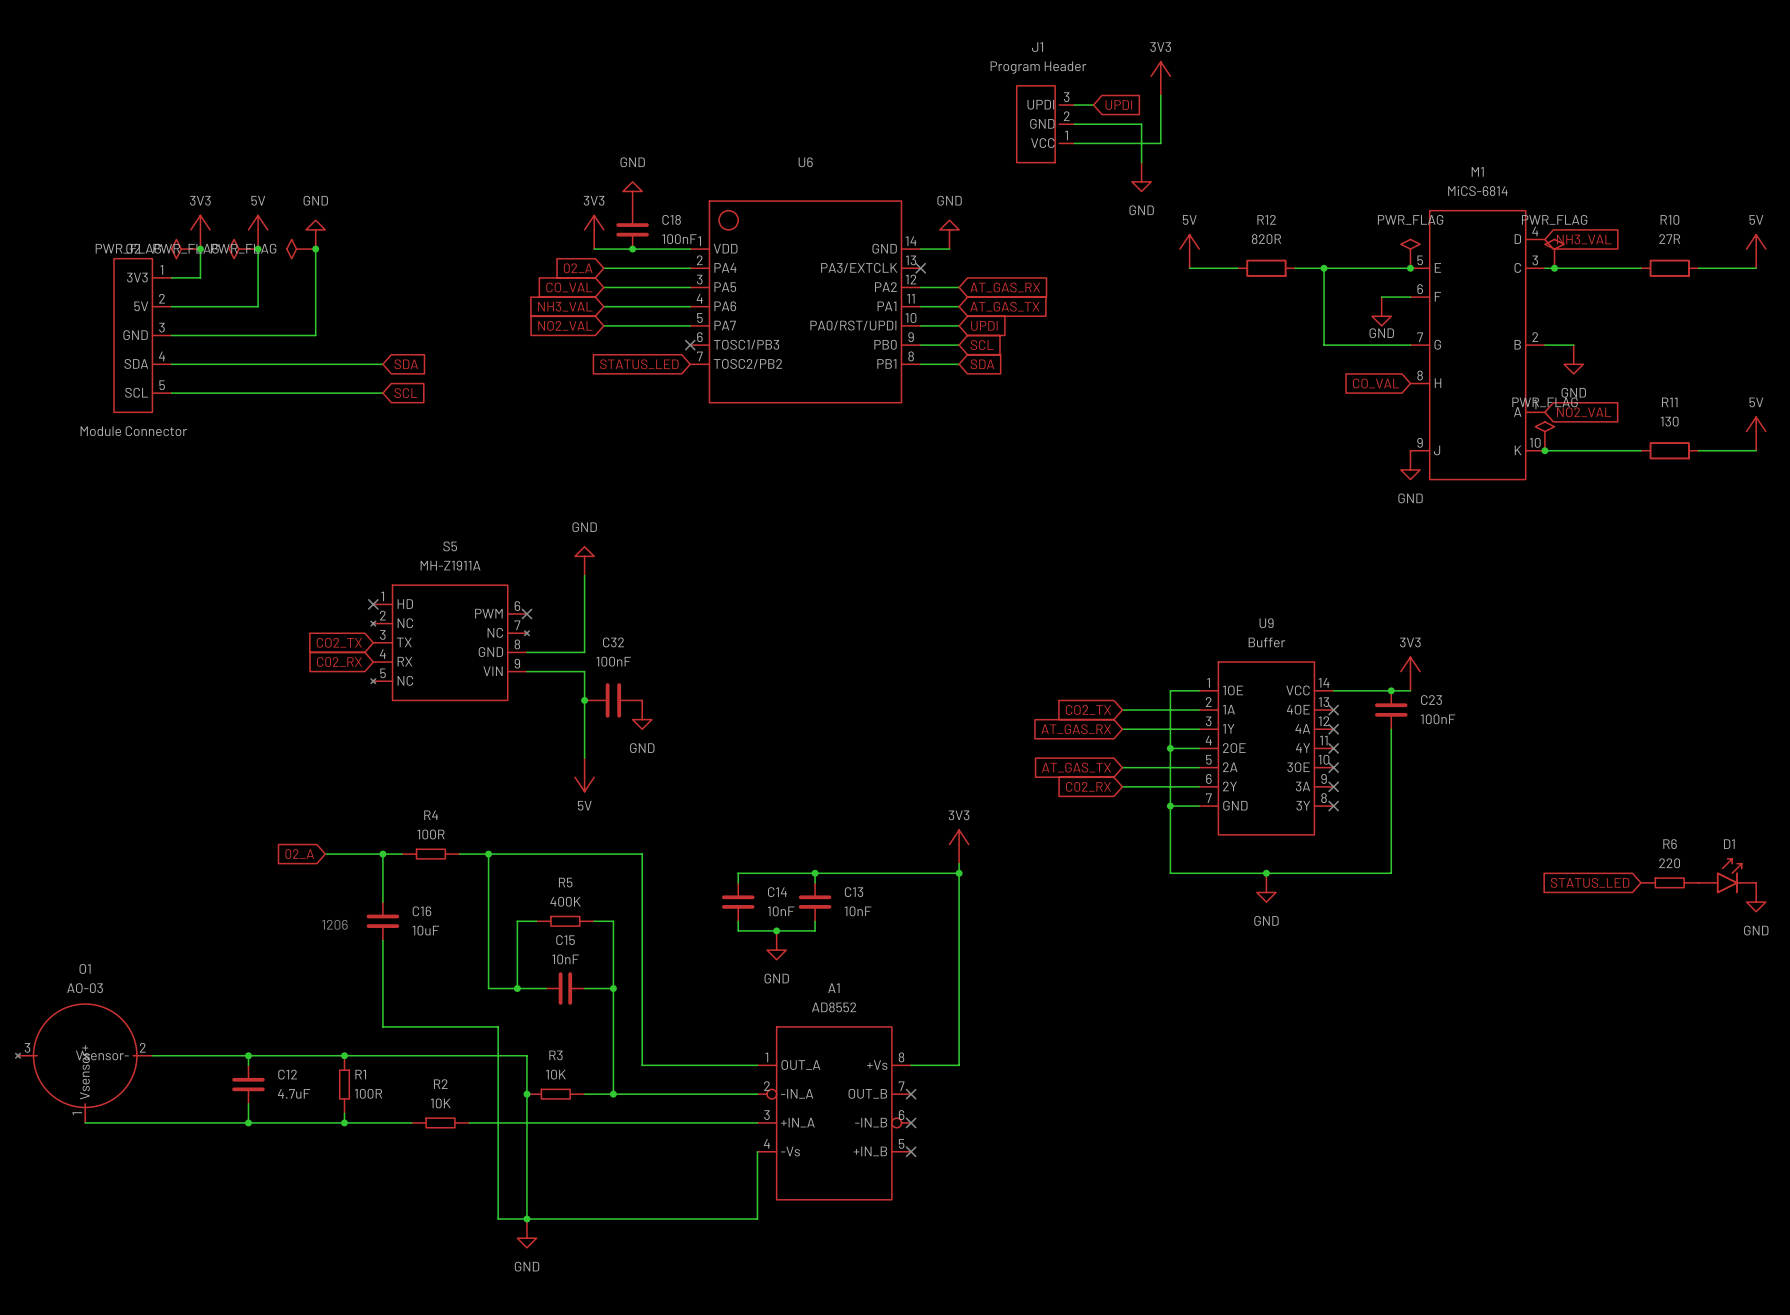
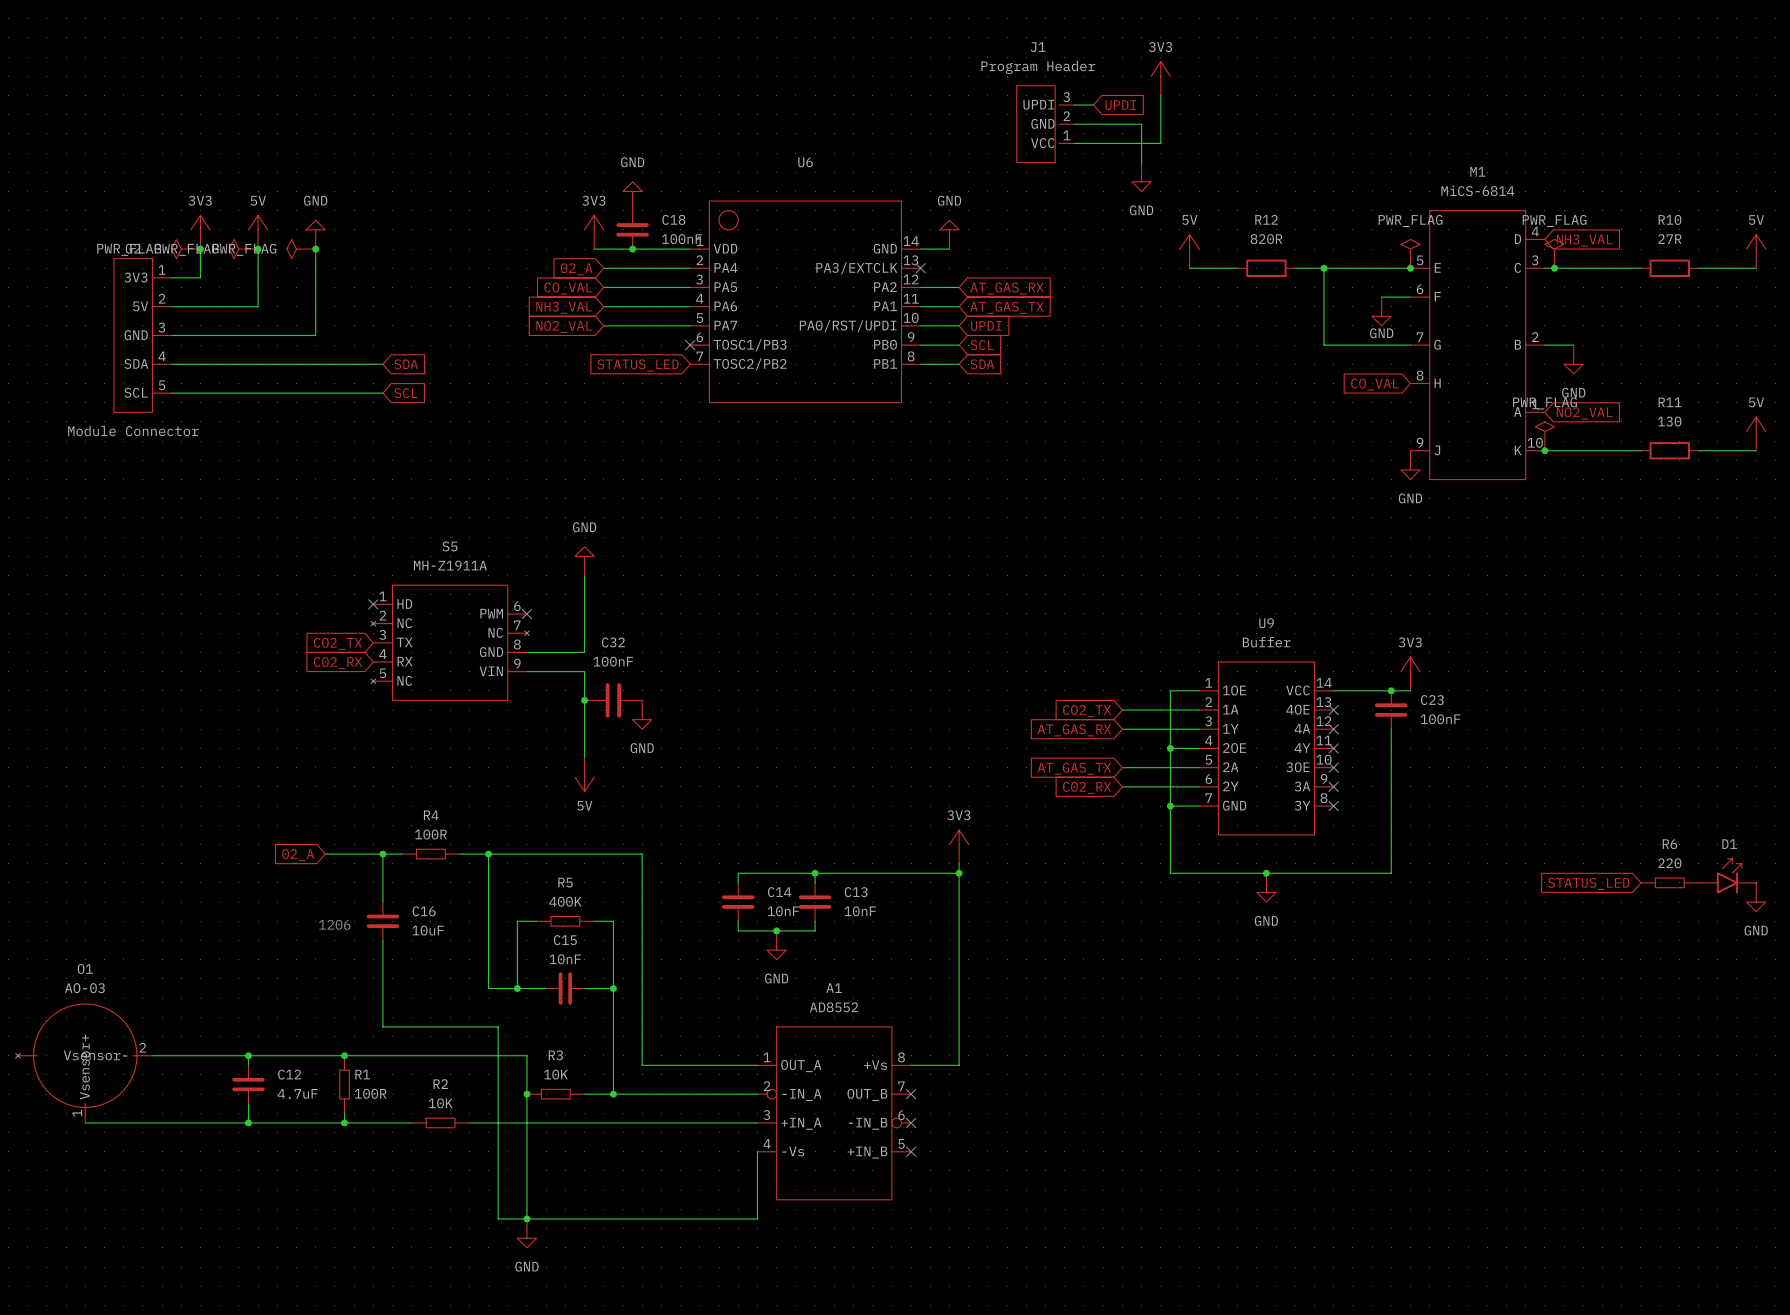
O1 pin number: 3 (27, 1047) -> none

